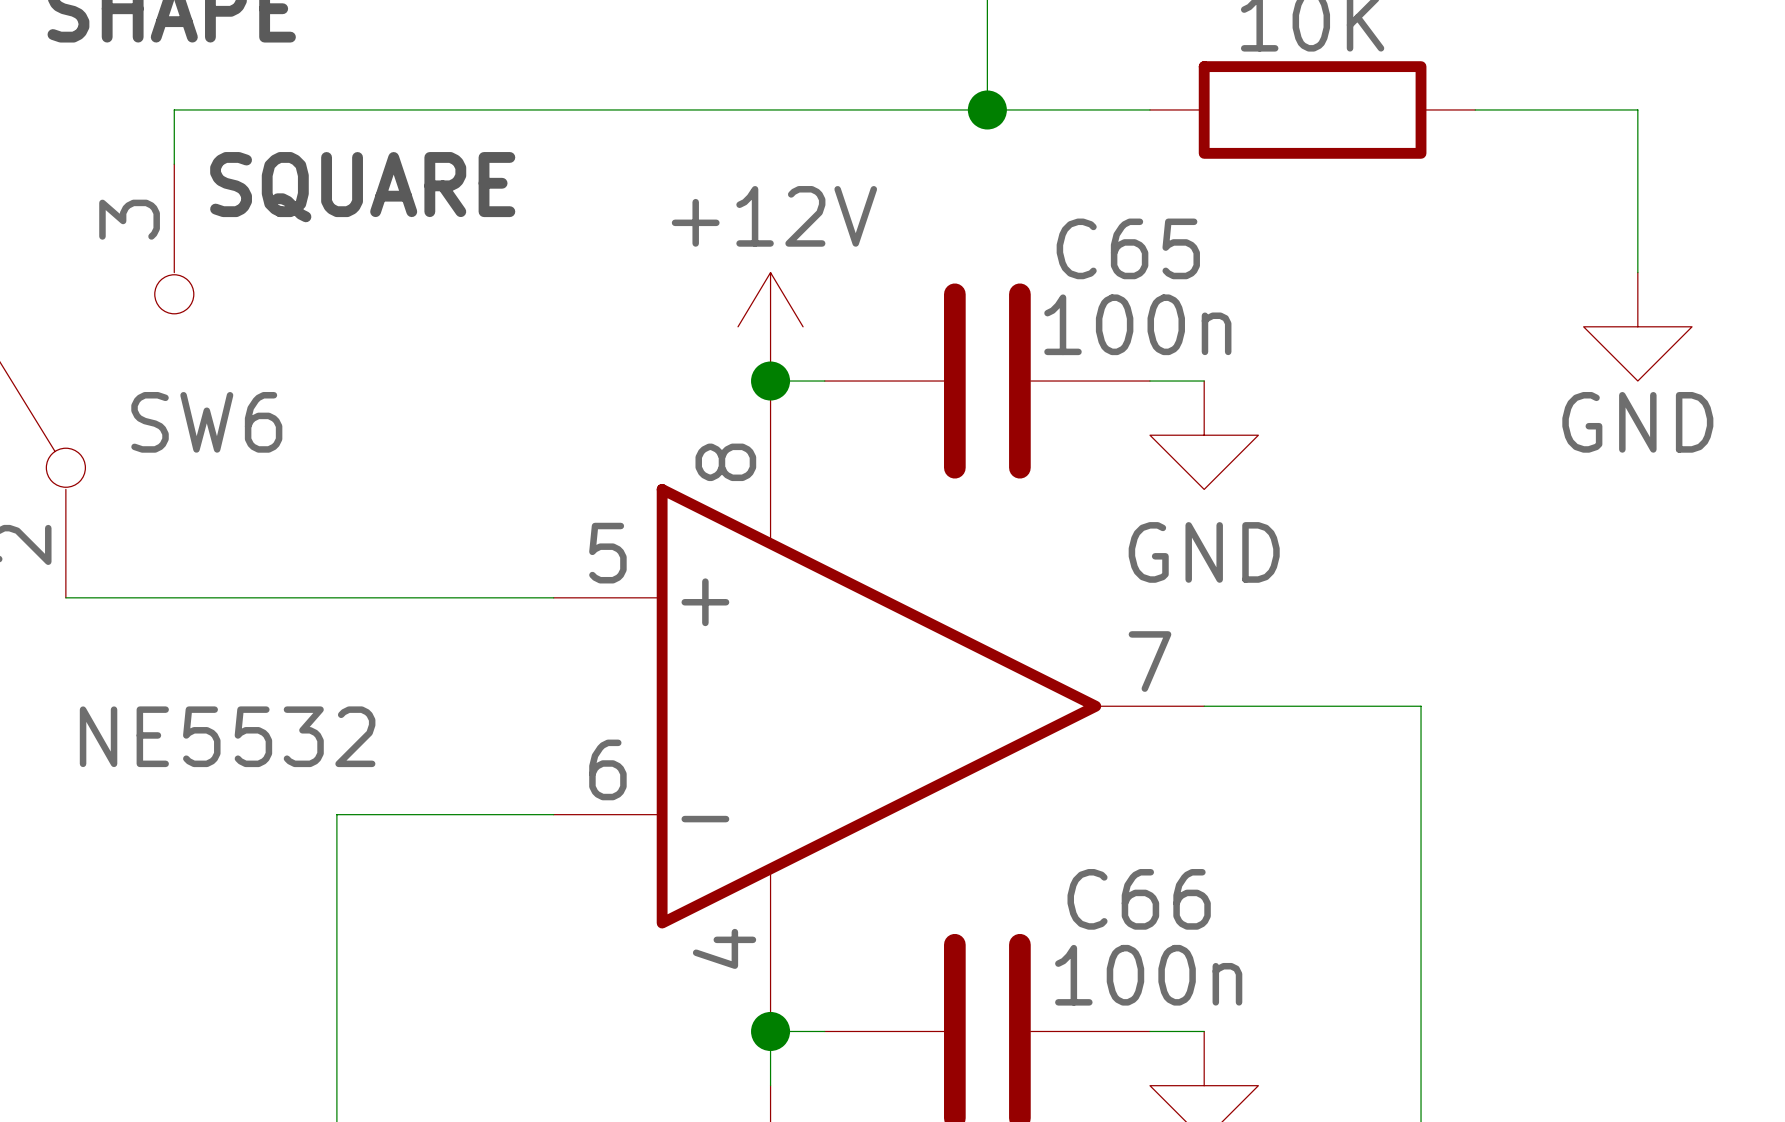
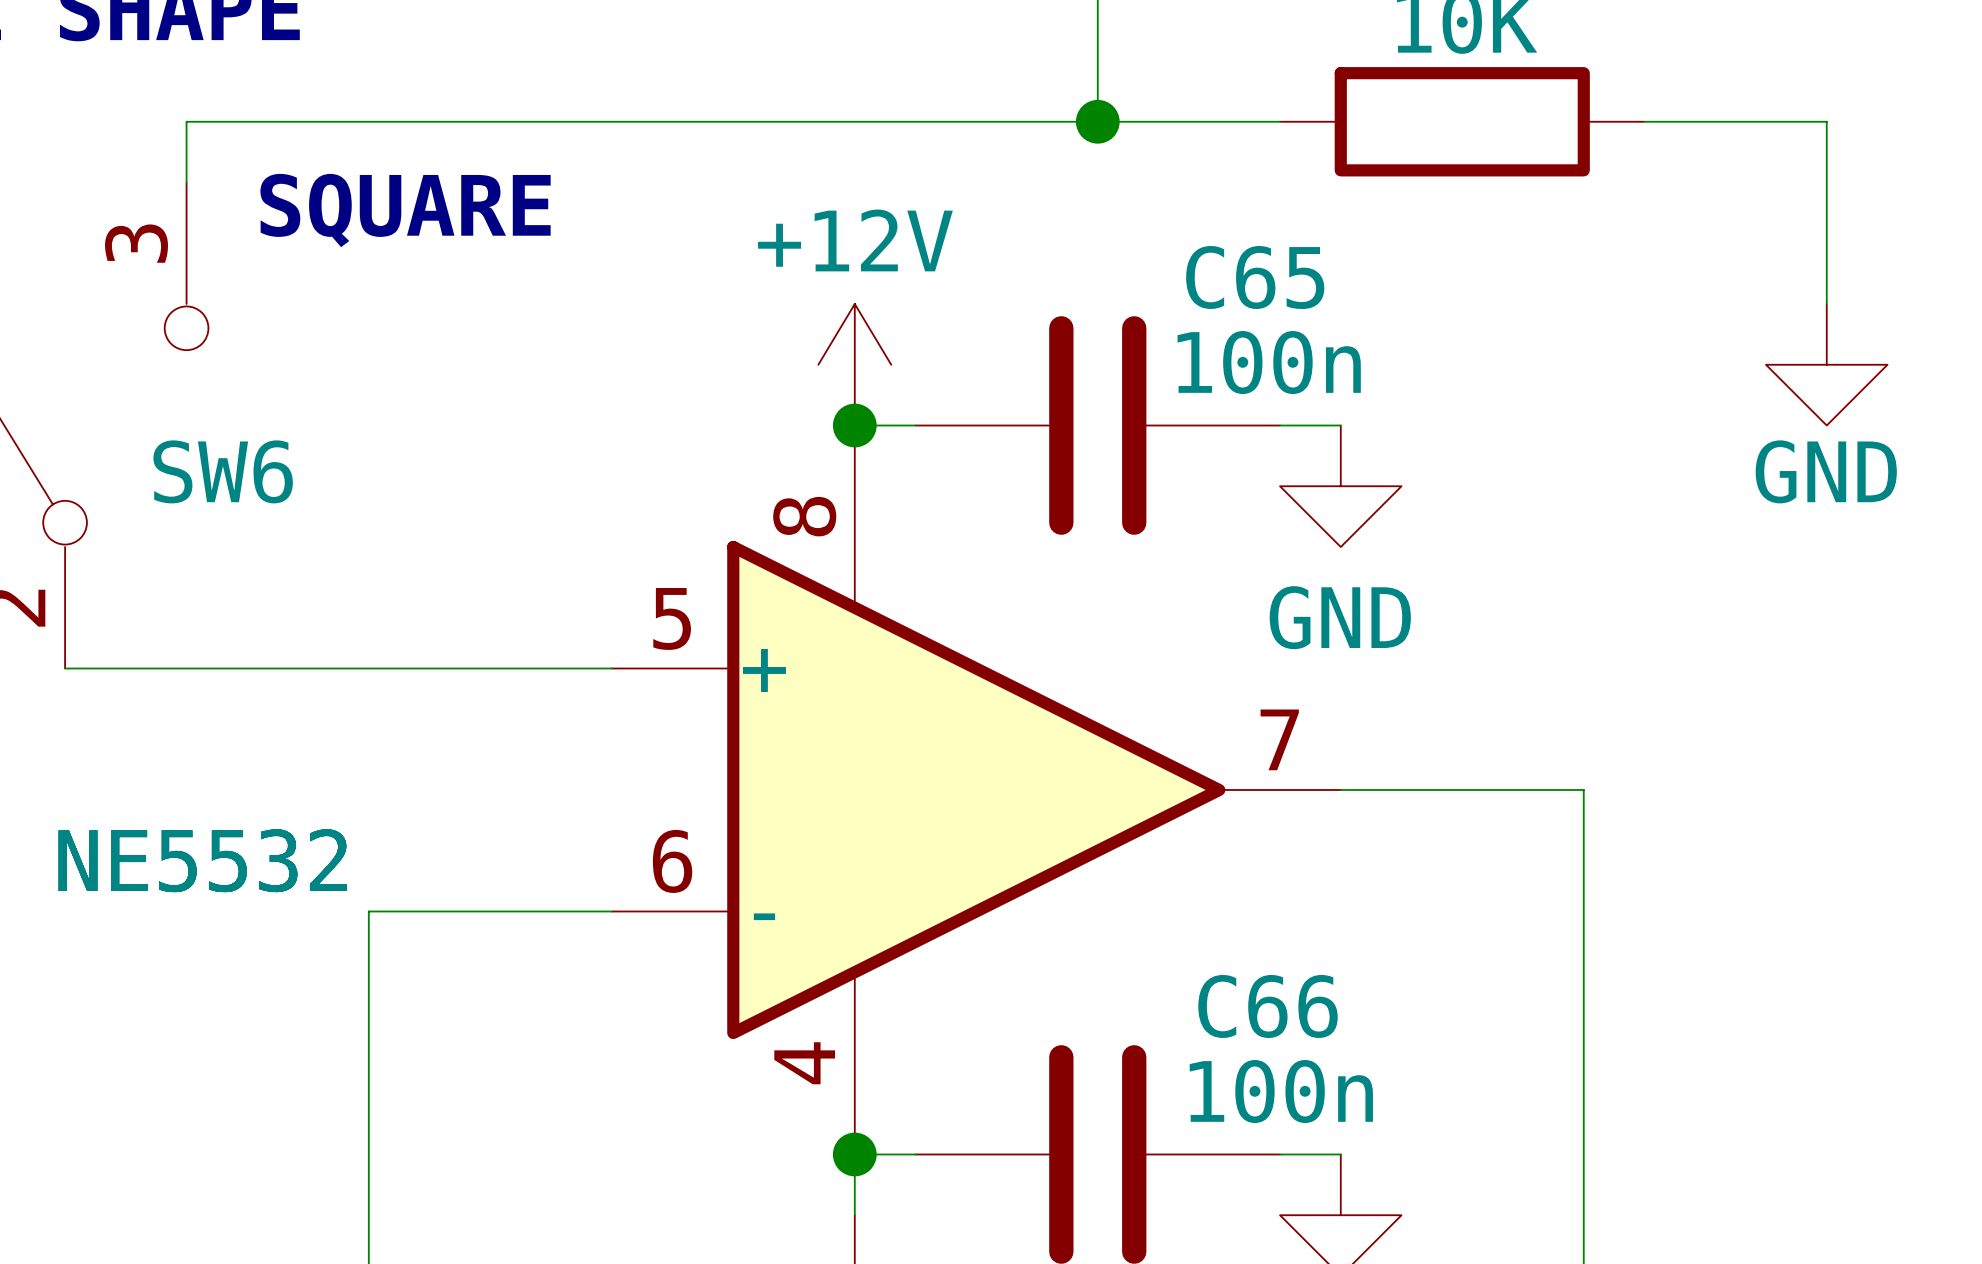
part value position: NE5532 (227, 736) -> NE5532 (202, 860)
part value: none -> NE5532 (202, 860)

